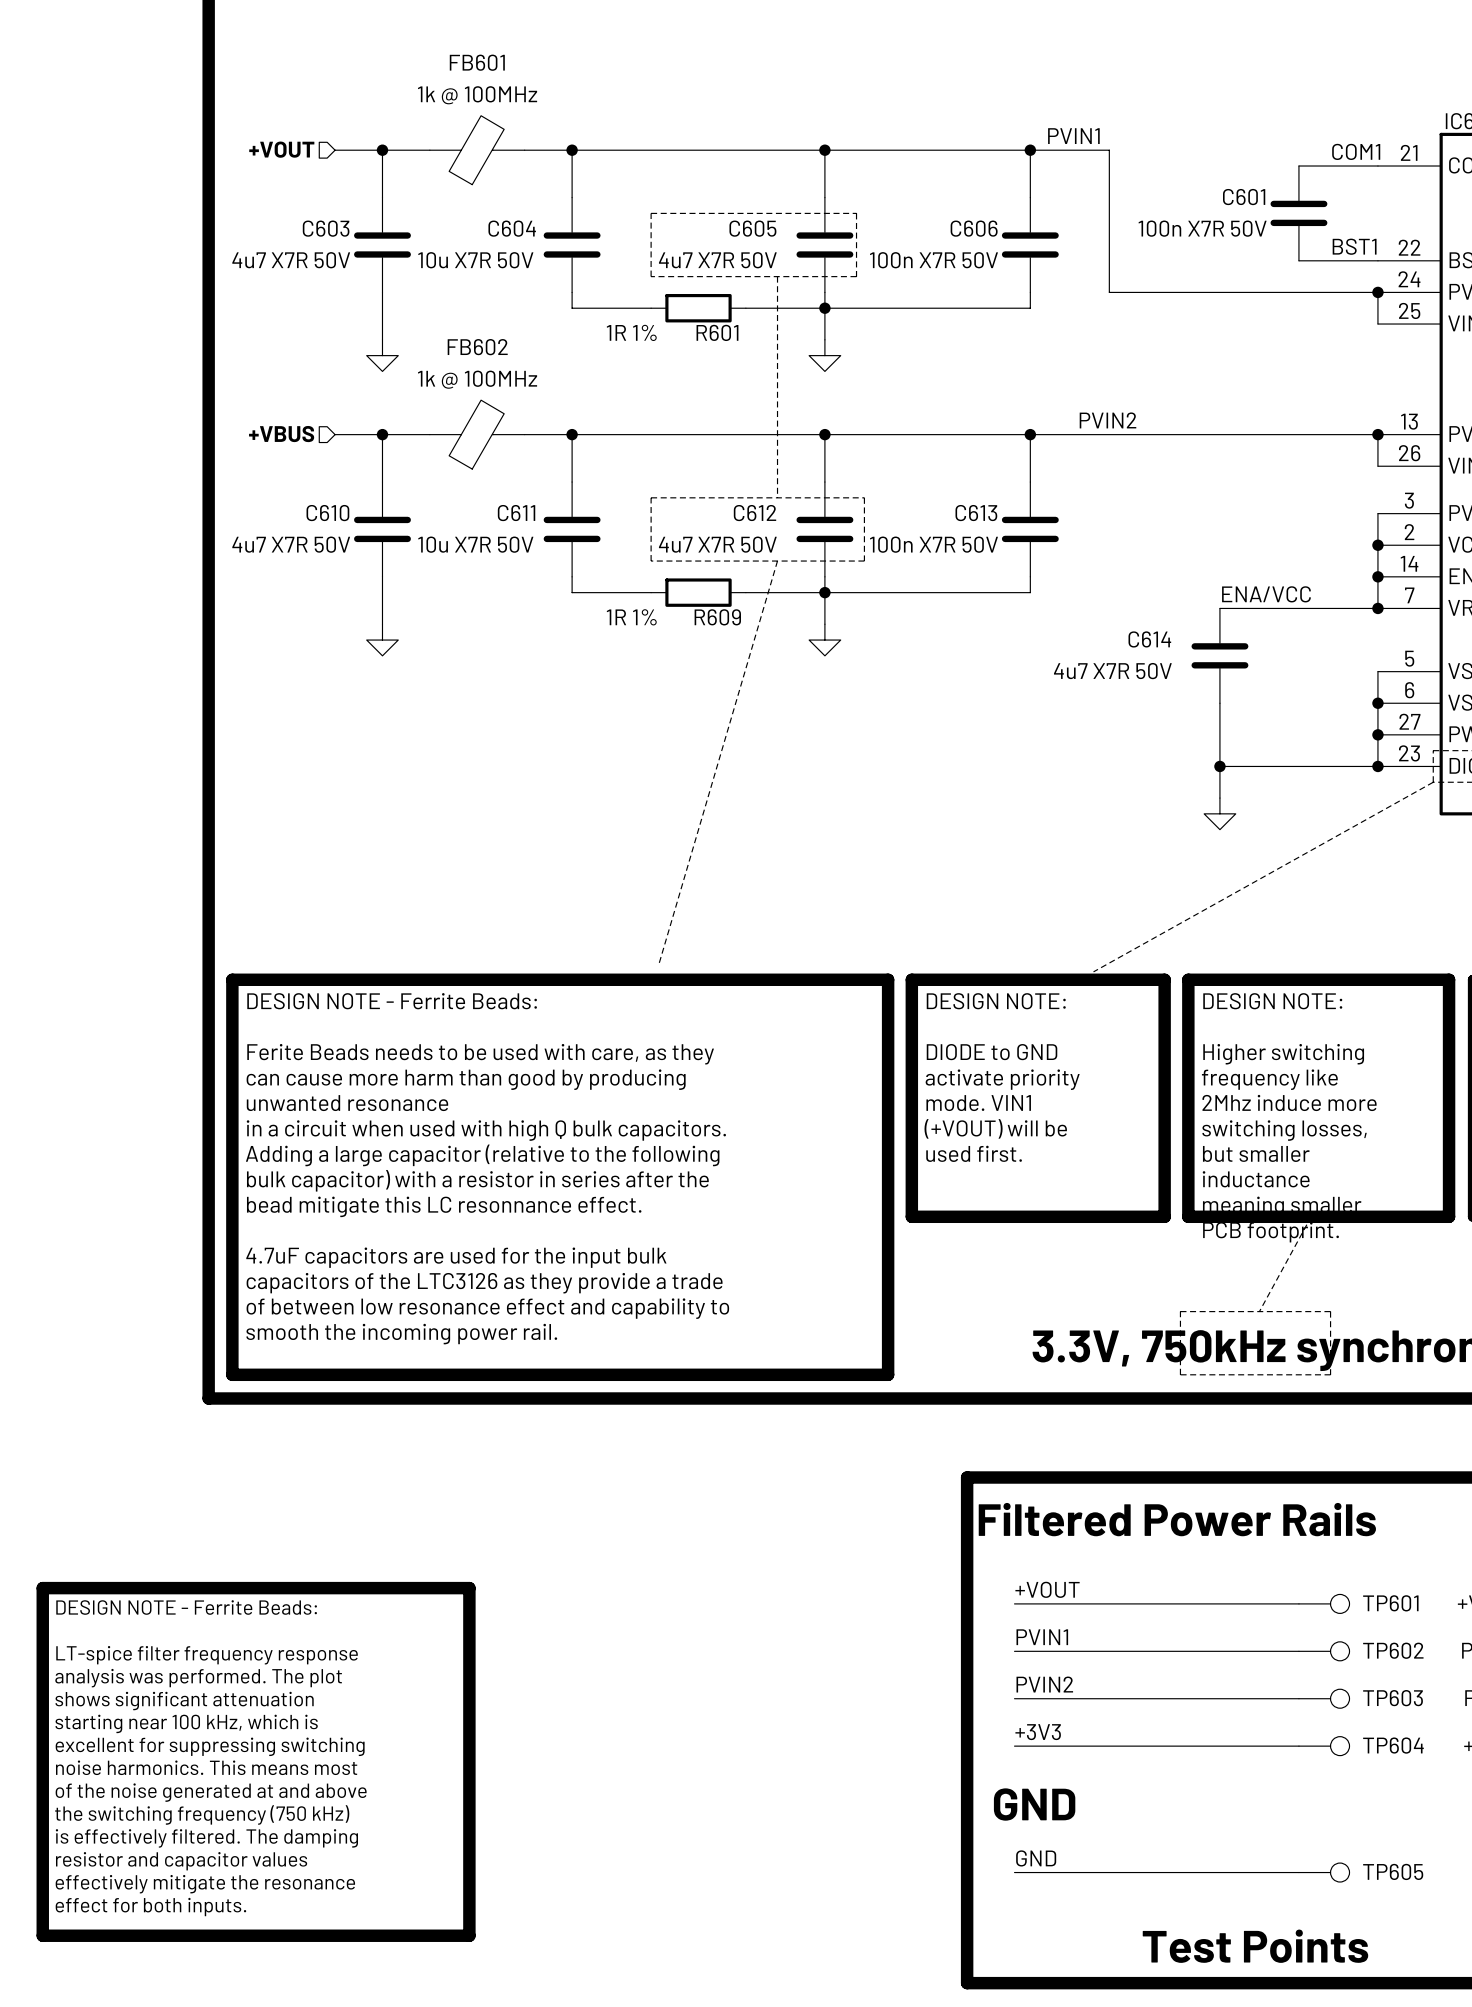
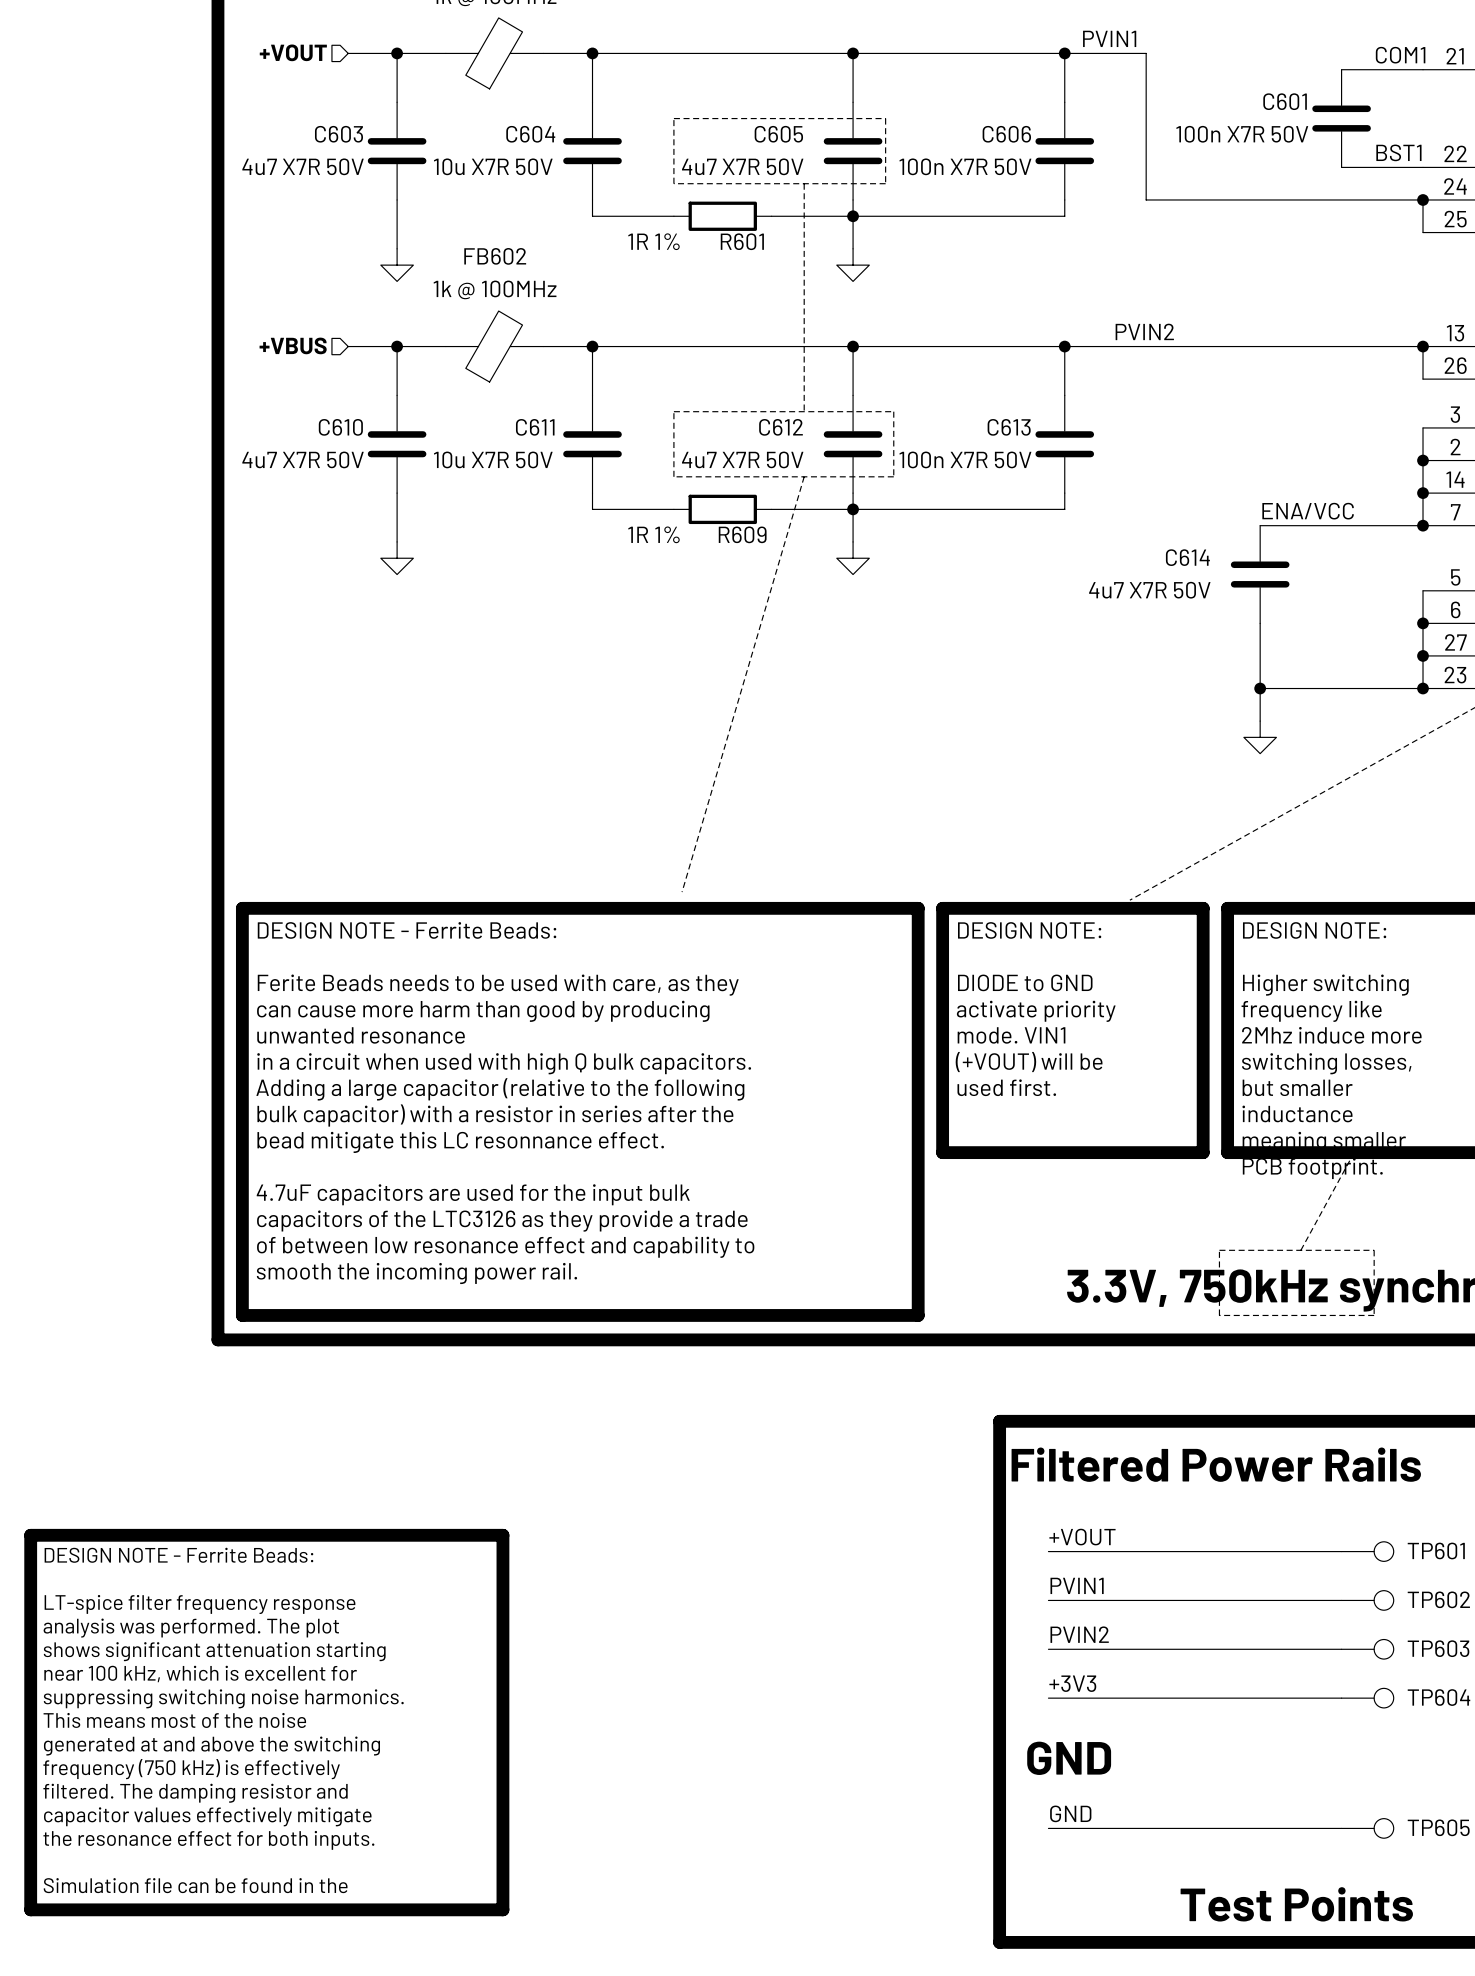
line: (42, 1588) (42, 1935) (469, 1935) (469, 1588) -> (46, 1535) (30, 1535) (30, 1909) (502, 1909) (502, 1535) (486, 1535)
text position: DESIGN NOTE - Ferrite Beads: (186, 1607) -> DESIGN NOTE - Ferrite Beads: (178, 1555)
text position: LT-spice filter frequency response (207, 1655) -> LT-spice filter frequency response (199, 1604)
text position: analysis was performed. The plot (198, 1678) -> analysis was performed. The plot (191, 1628)
text: shows significant attenuation (184, 1701) -> shows significant attenuation starting (214, 1651)
text: starting near 100 kHz, which is (186, 1723) -> near 100 kHz, which is excellent for (200, 1674)
text: excellent for suppressing switching (210, 1746) -> none
text: none -> suppressing switching noise harmonics. (223, 1698)
text: none -> This means most of the noise (174, 1720)
text: noise harmonics. This means most (206, 1767) -> none
text: of the noise generated at and above (211, 1792) -> generated at and above the switching (211, 1746)
text: none -> frequency (750 kHz) is effectively (191, 1769)
text: the switching frequency (750 kHz) (202, 1814) -> none
text: none -> filtered. The damping resistor and (195, 1793)
text: is effectively filtered. The damping (206, 1838) -> none
text: resistor and capacitor values (181, 1861) -> none
text: none -> capacitor values effectively mitigate (207, 1816)
text: effectively mitigate the resonance (205, 1884) -> none
text: effect for both inputs. (150, 1907) -> the resonance effect for both inputs. (208, 1840)
text: none -> Simulation file can be found in the (195, 1885)

